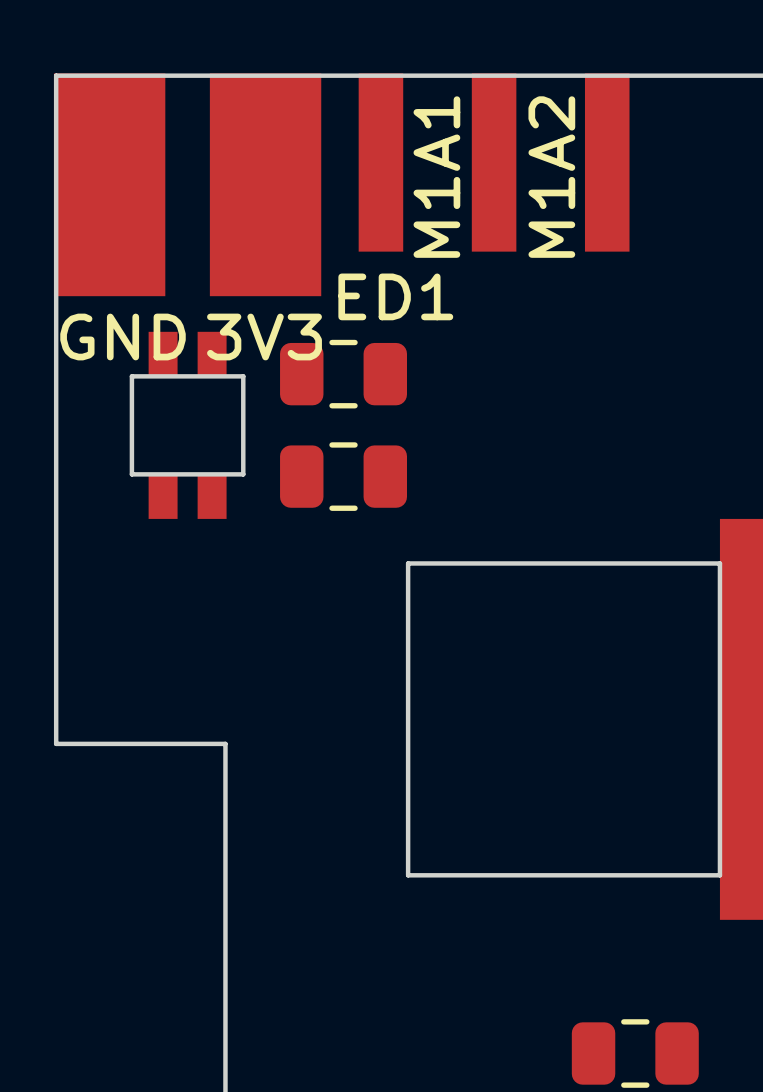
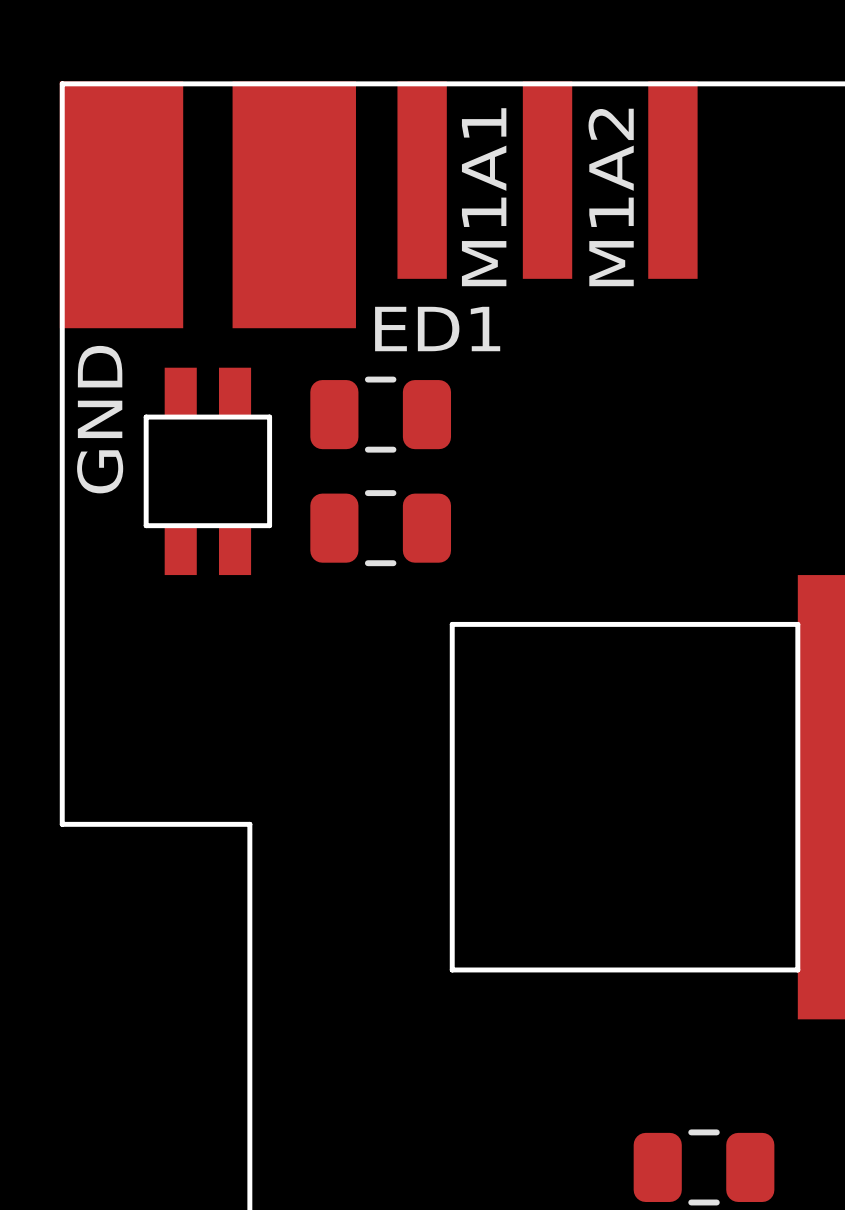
part value rotation: 0° (123, 337) -> 90° counterclockwise (100, 419)
part value: 3V3 (264, 337) -> none

